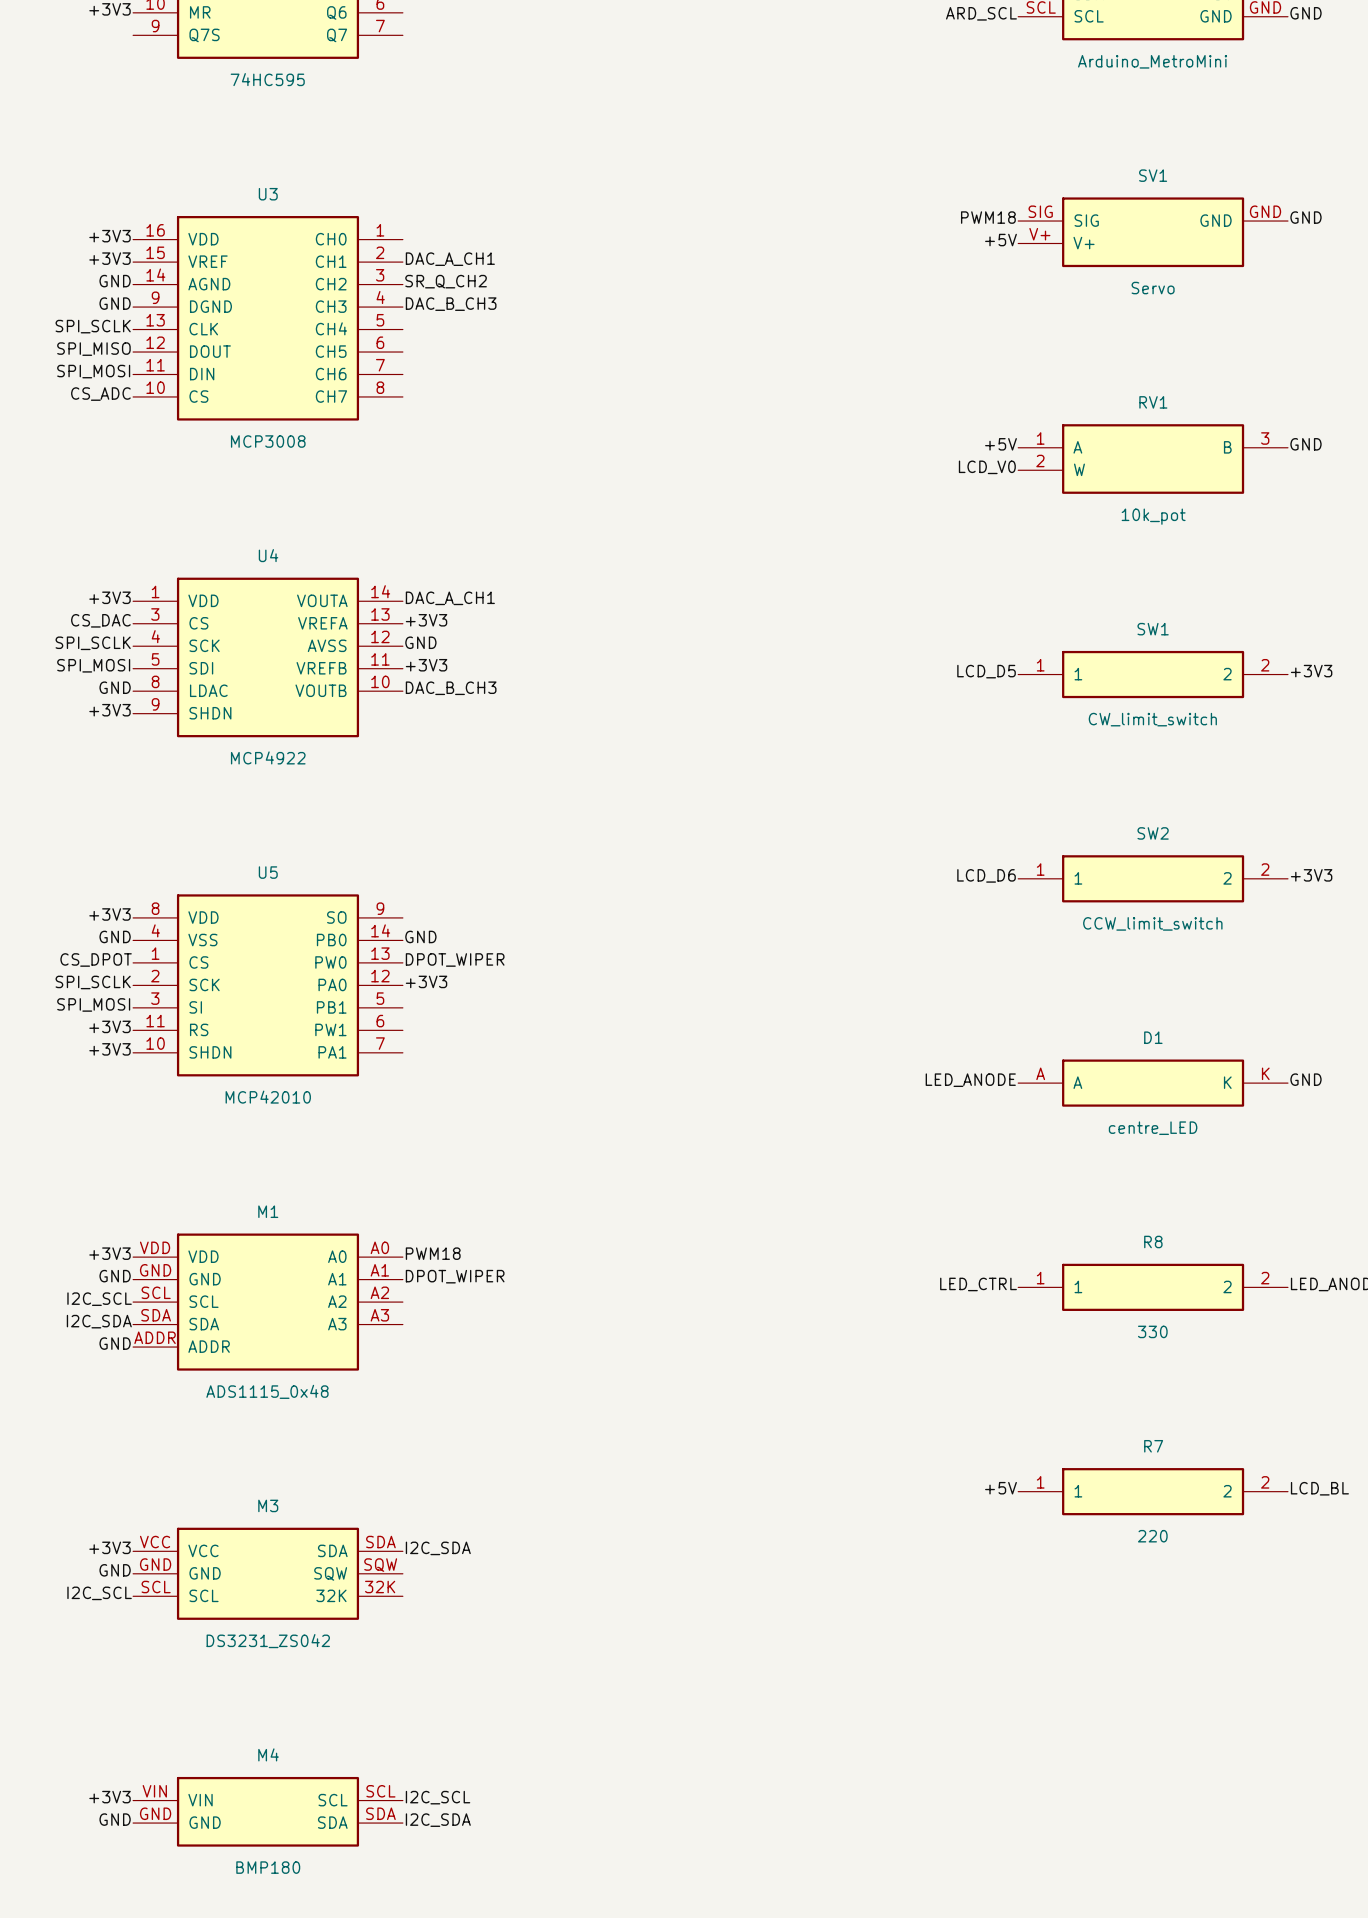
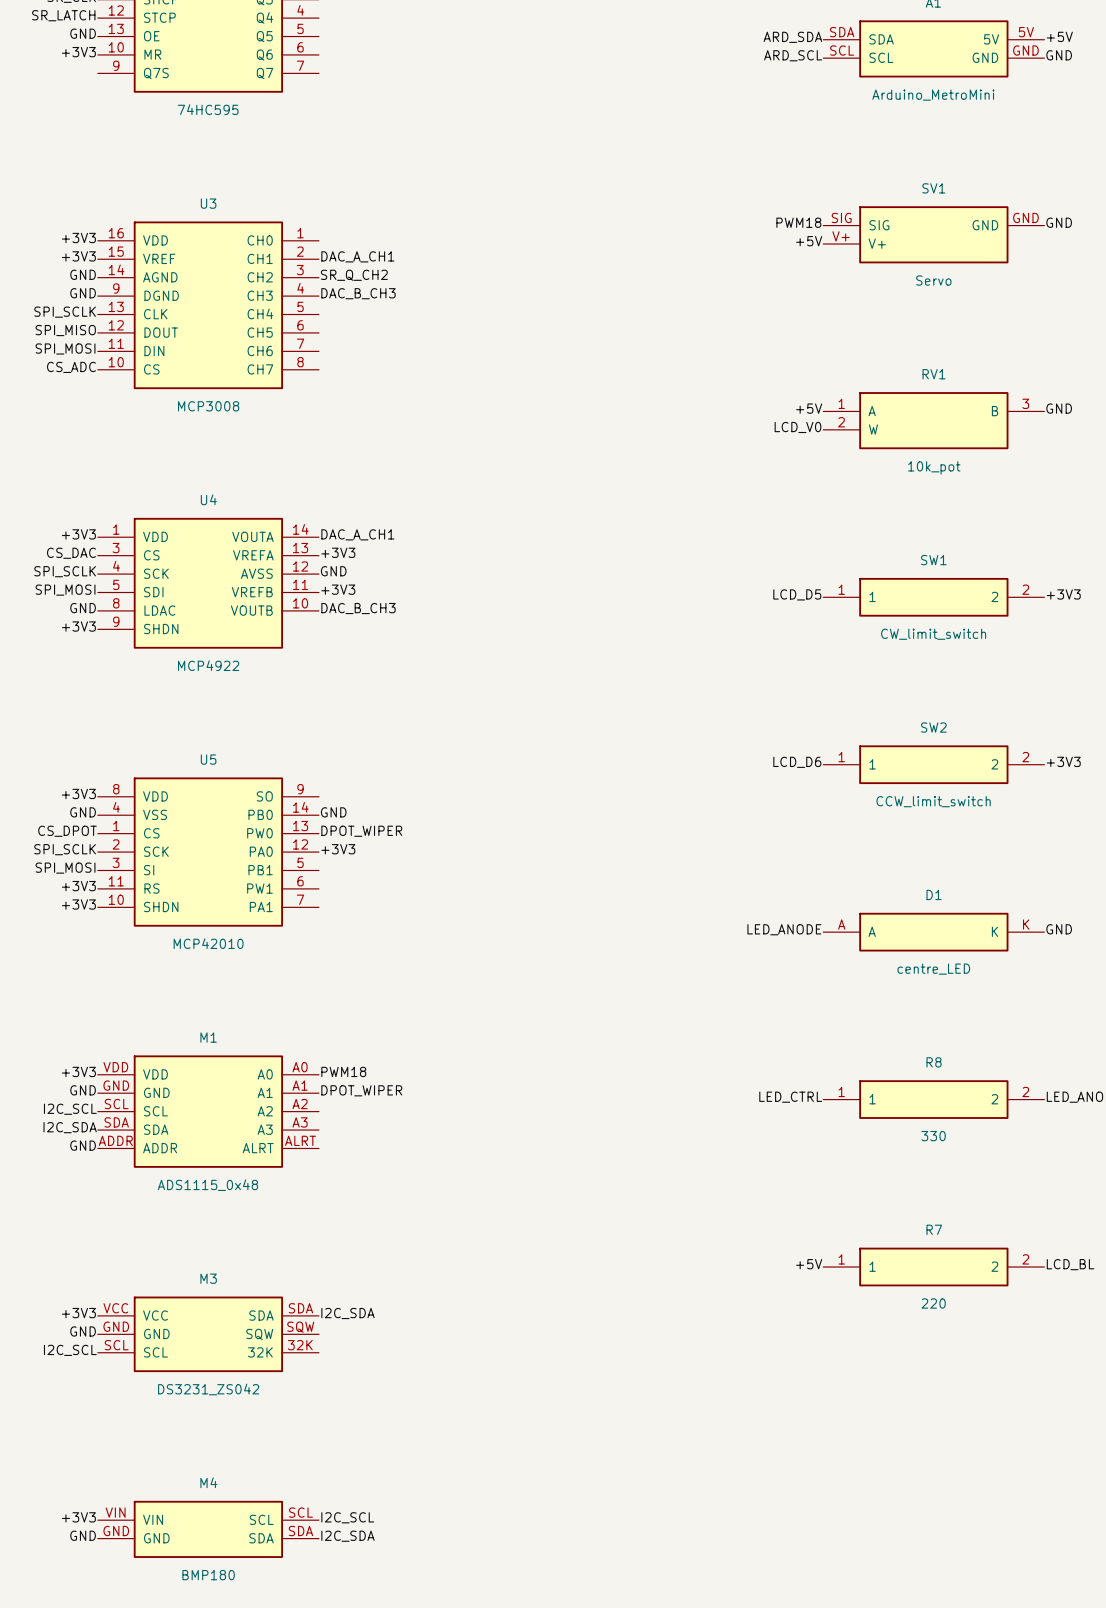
M1 symbol: [133, 1233, 403, 1371] -> [97, 1055, 319, 1168]

